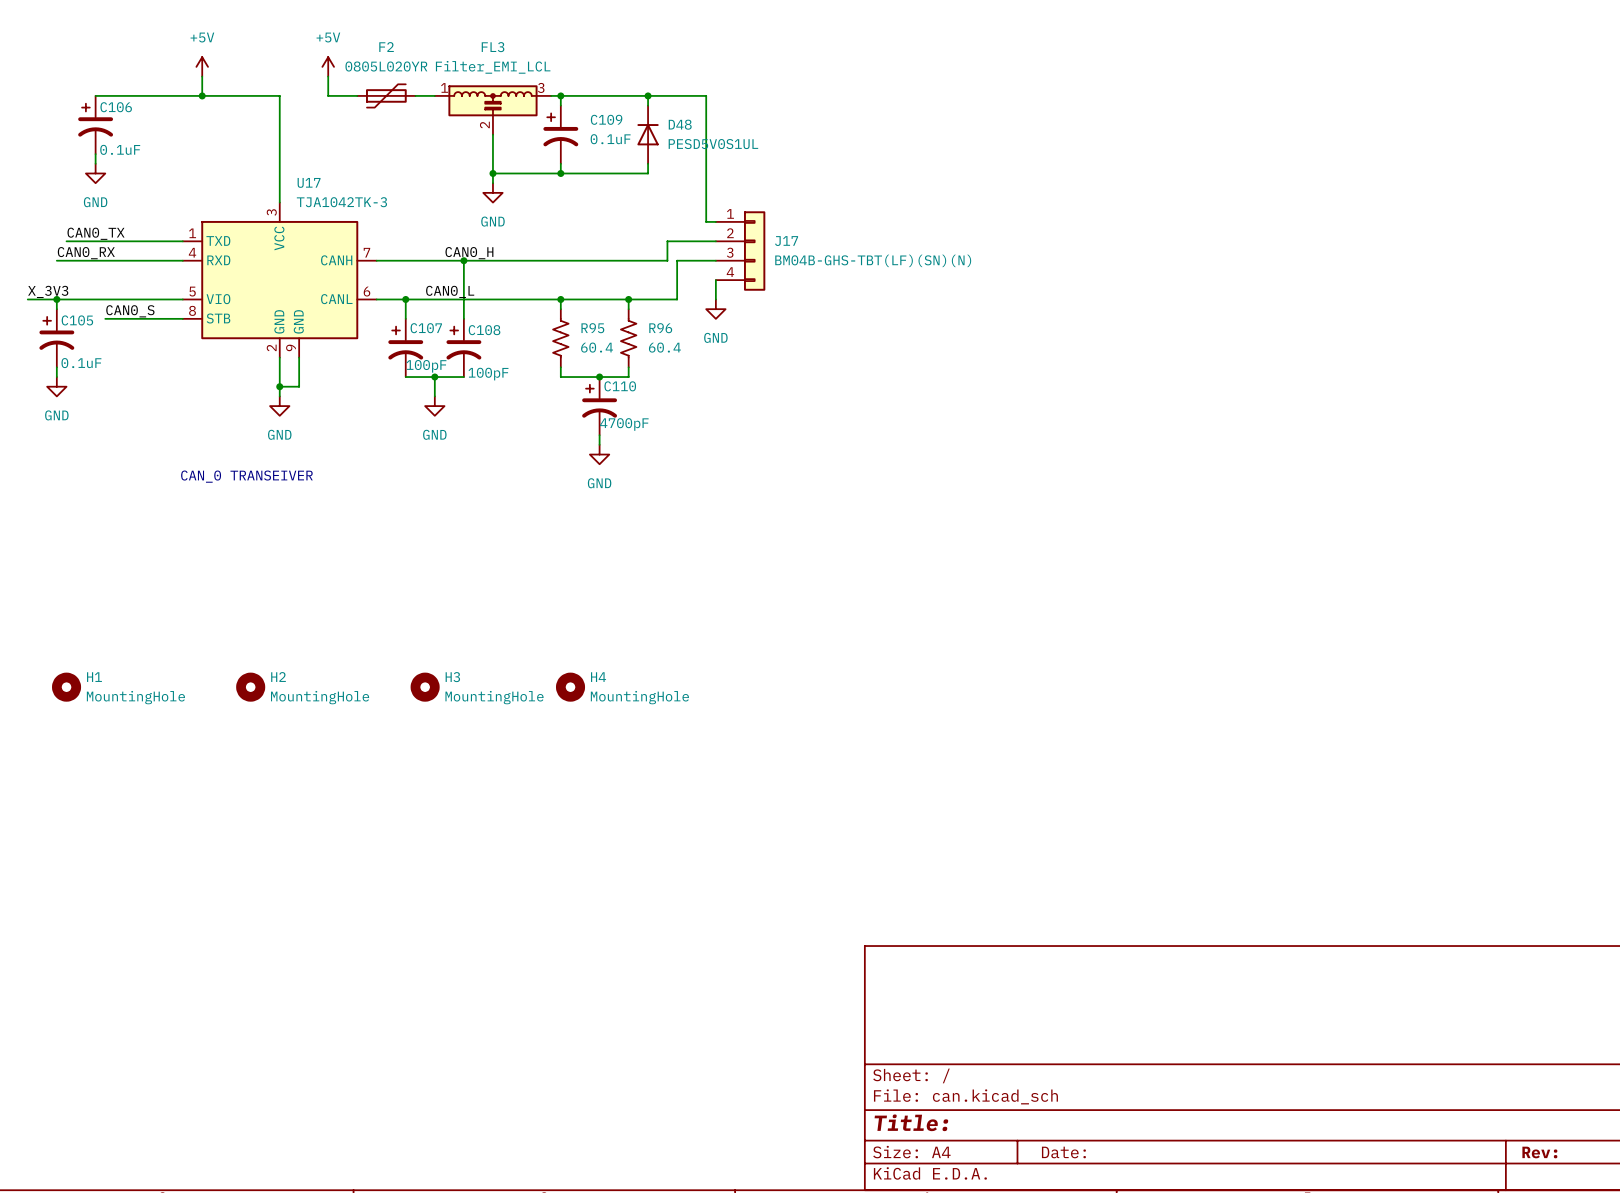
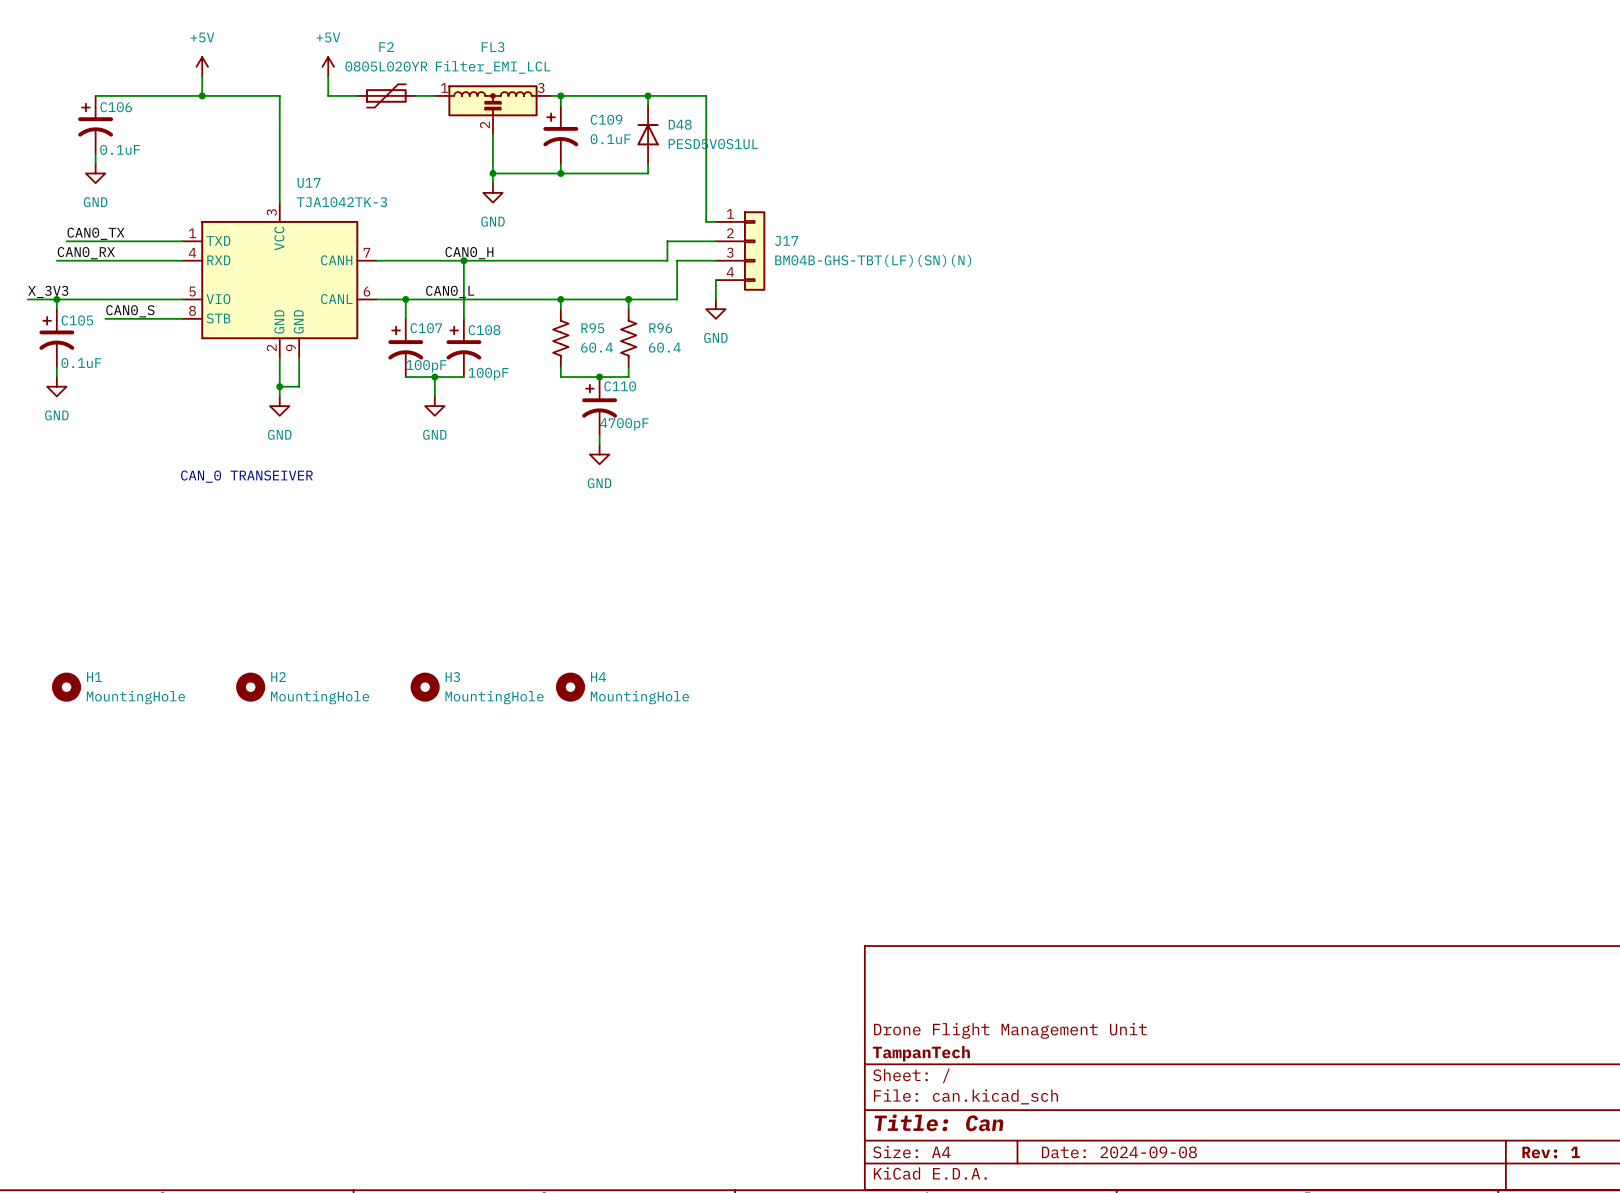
title block: none -> Drone Flight Management Unit (1010, 1030)
title block: none -> TampanTech (921, 1053)
title block: Title: (911, 1122) -> Title: Can (938, 1122)
title block: Date: (1063, 1152) -> Date: 2024-09-08 (1119, 1152)
title block: Rev: (1539, 1152) -> Rev: 1 (1551, 1152)

